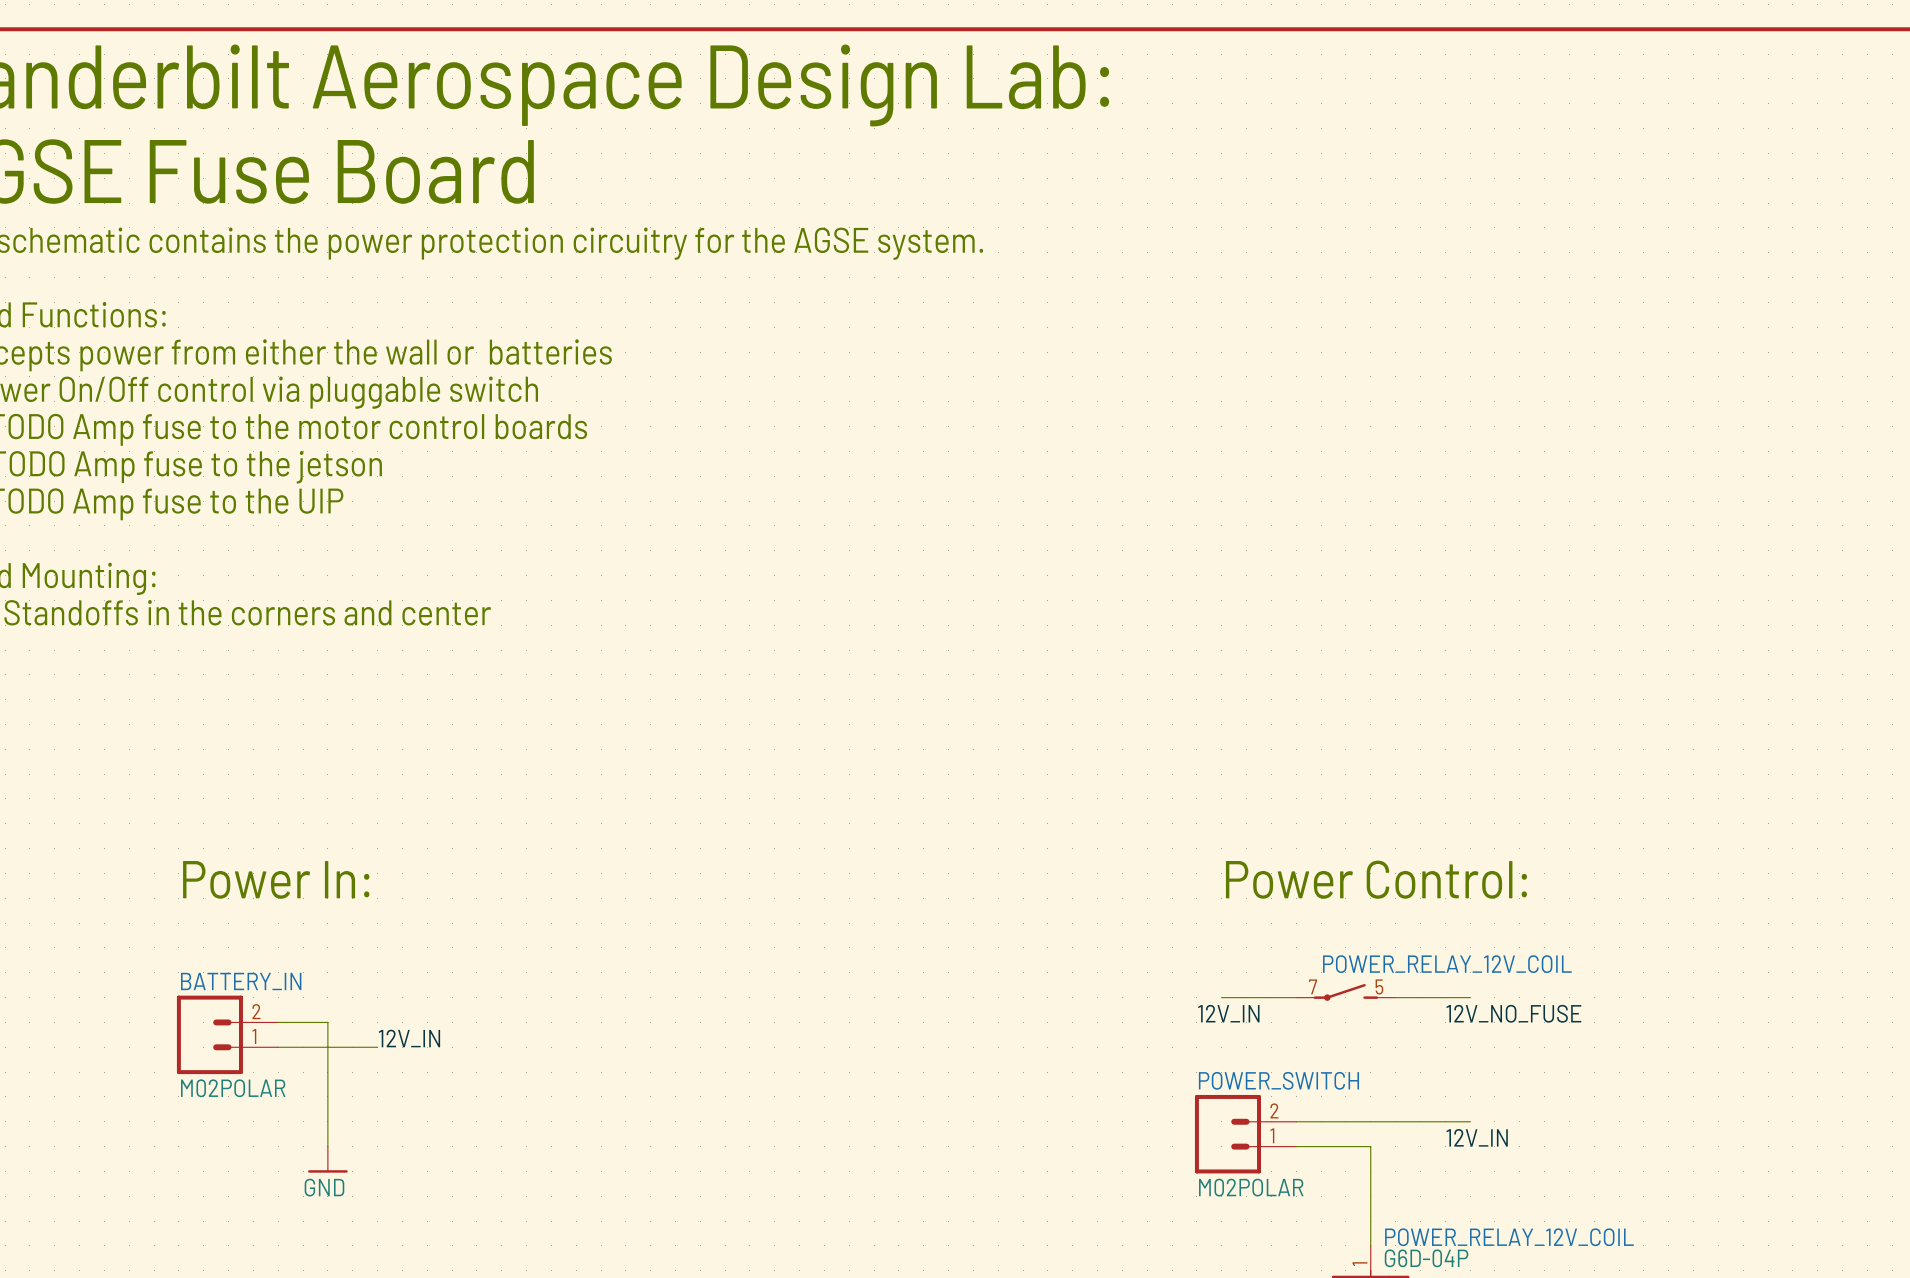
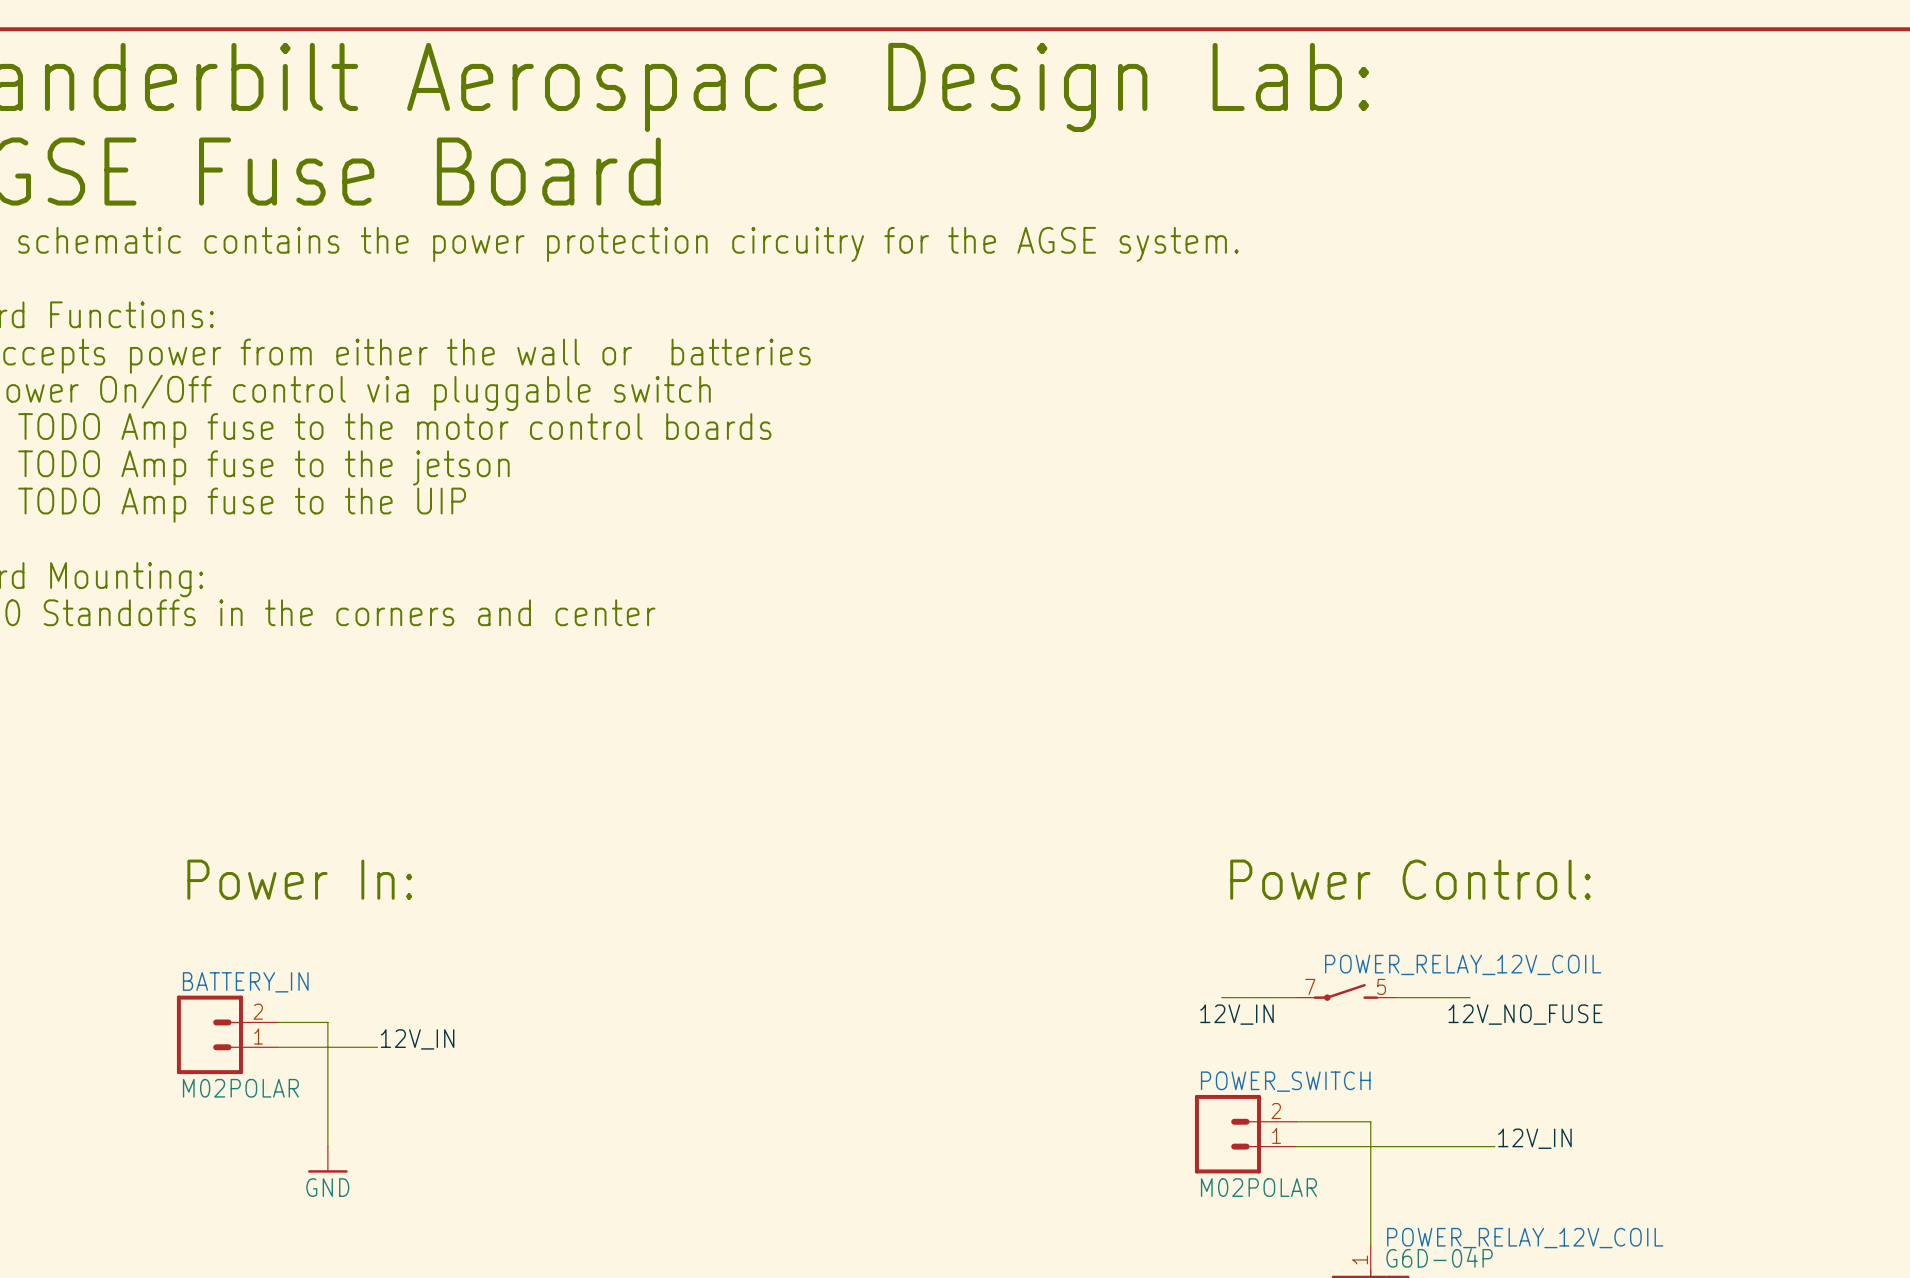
wire: (1370, 1121) (1470, 1121) -> (1370, 1121) (1370, 1146) (1494, 1146)
label position: 12V_IN (1477, 1137) -> 12V_IN (1534, 1138)

